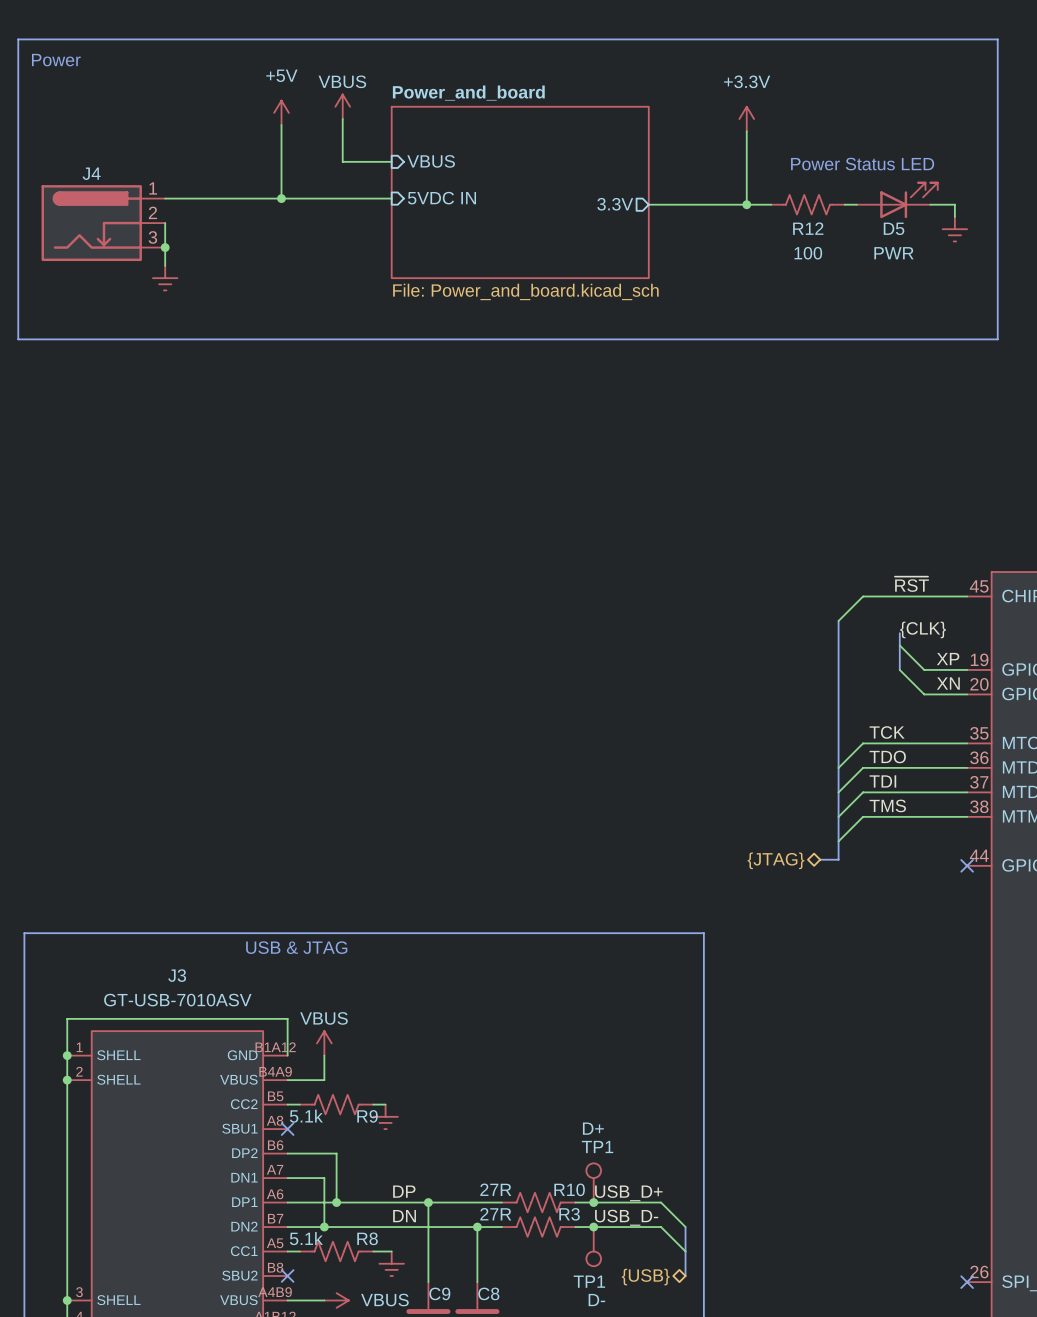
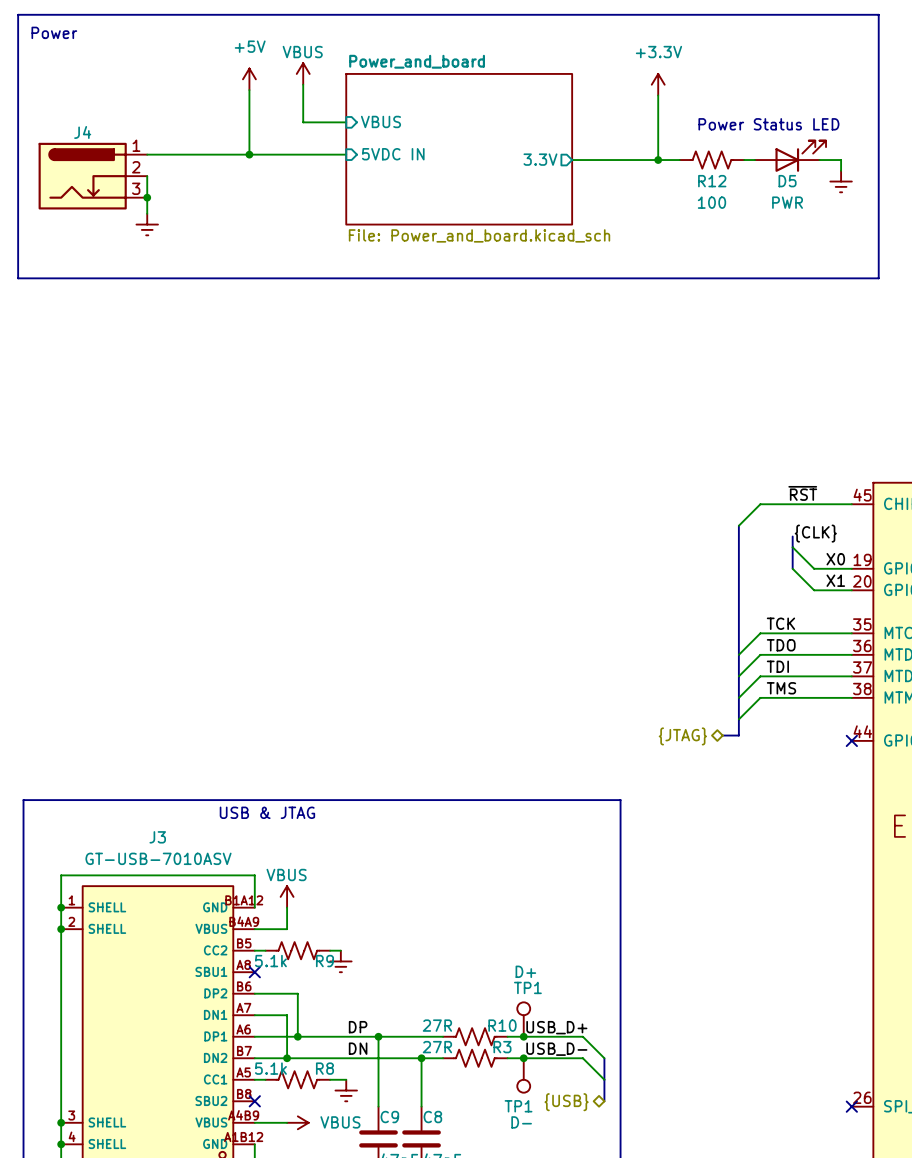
label: XP (948, 659) -> X0 (835, 559)
label: XN (948, 683) -> X1 (835, 580)

